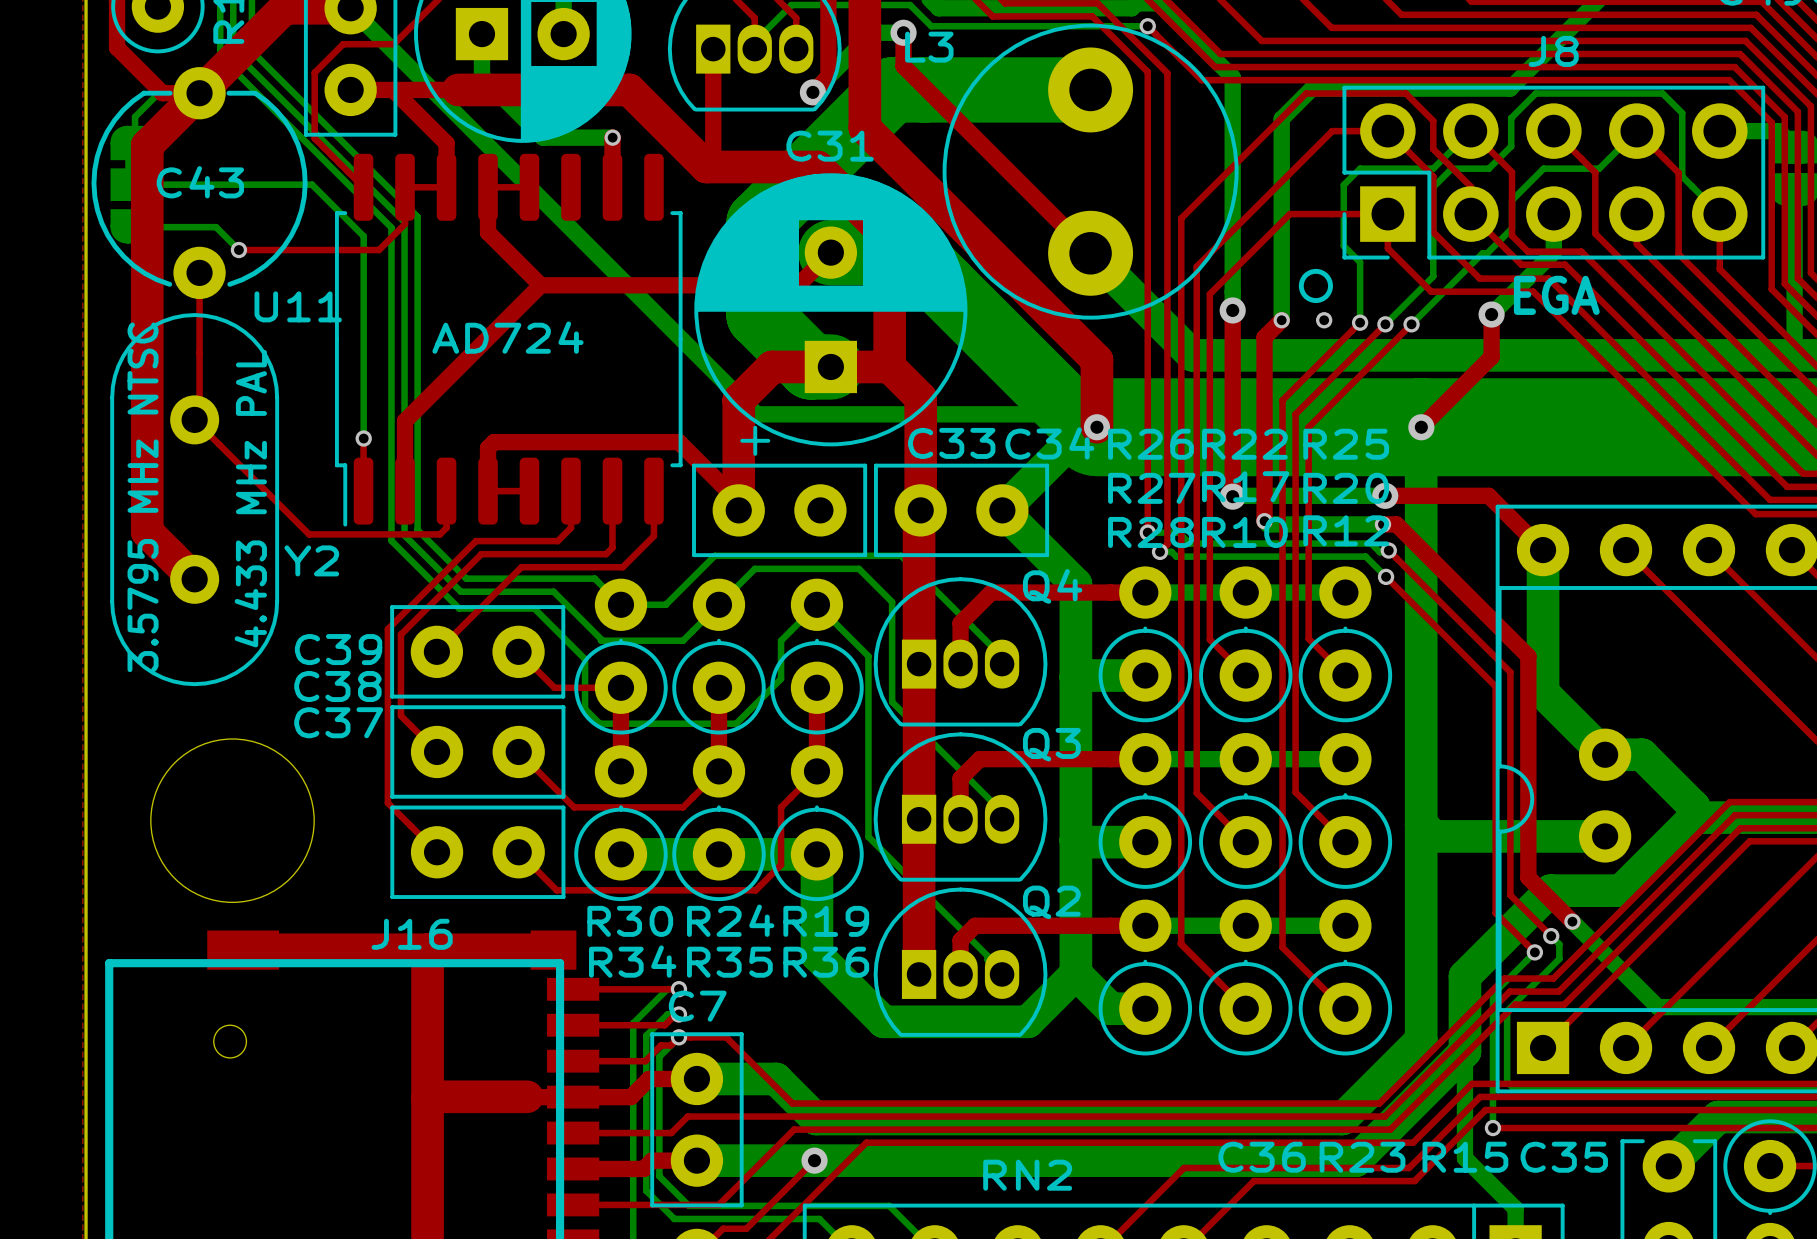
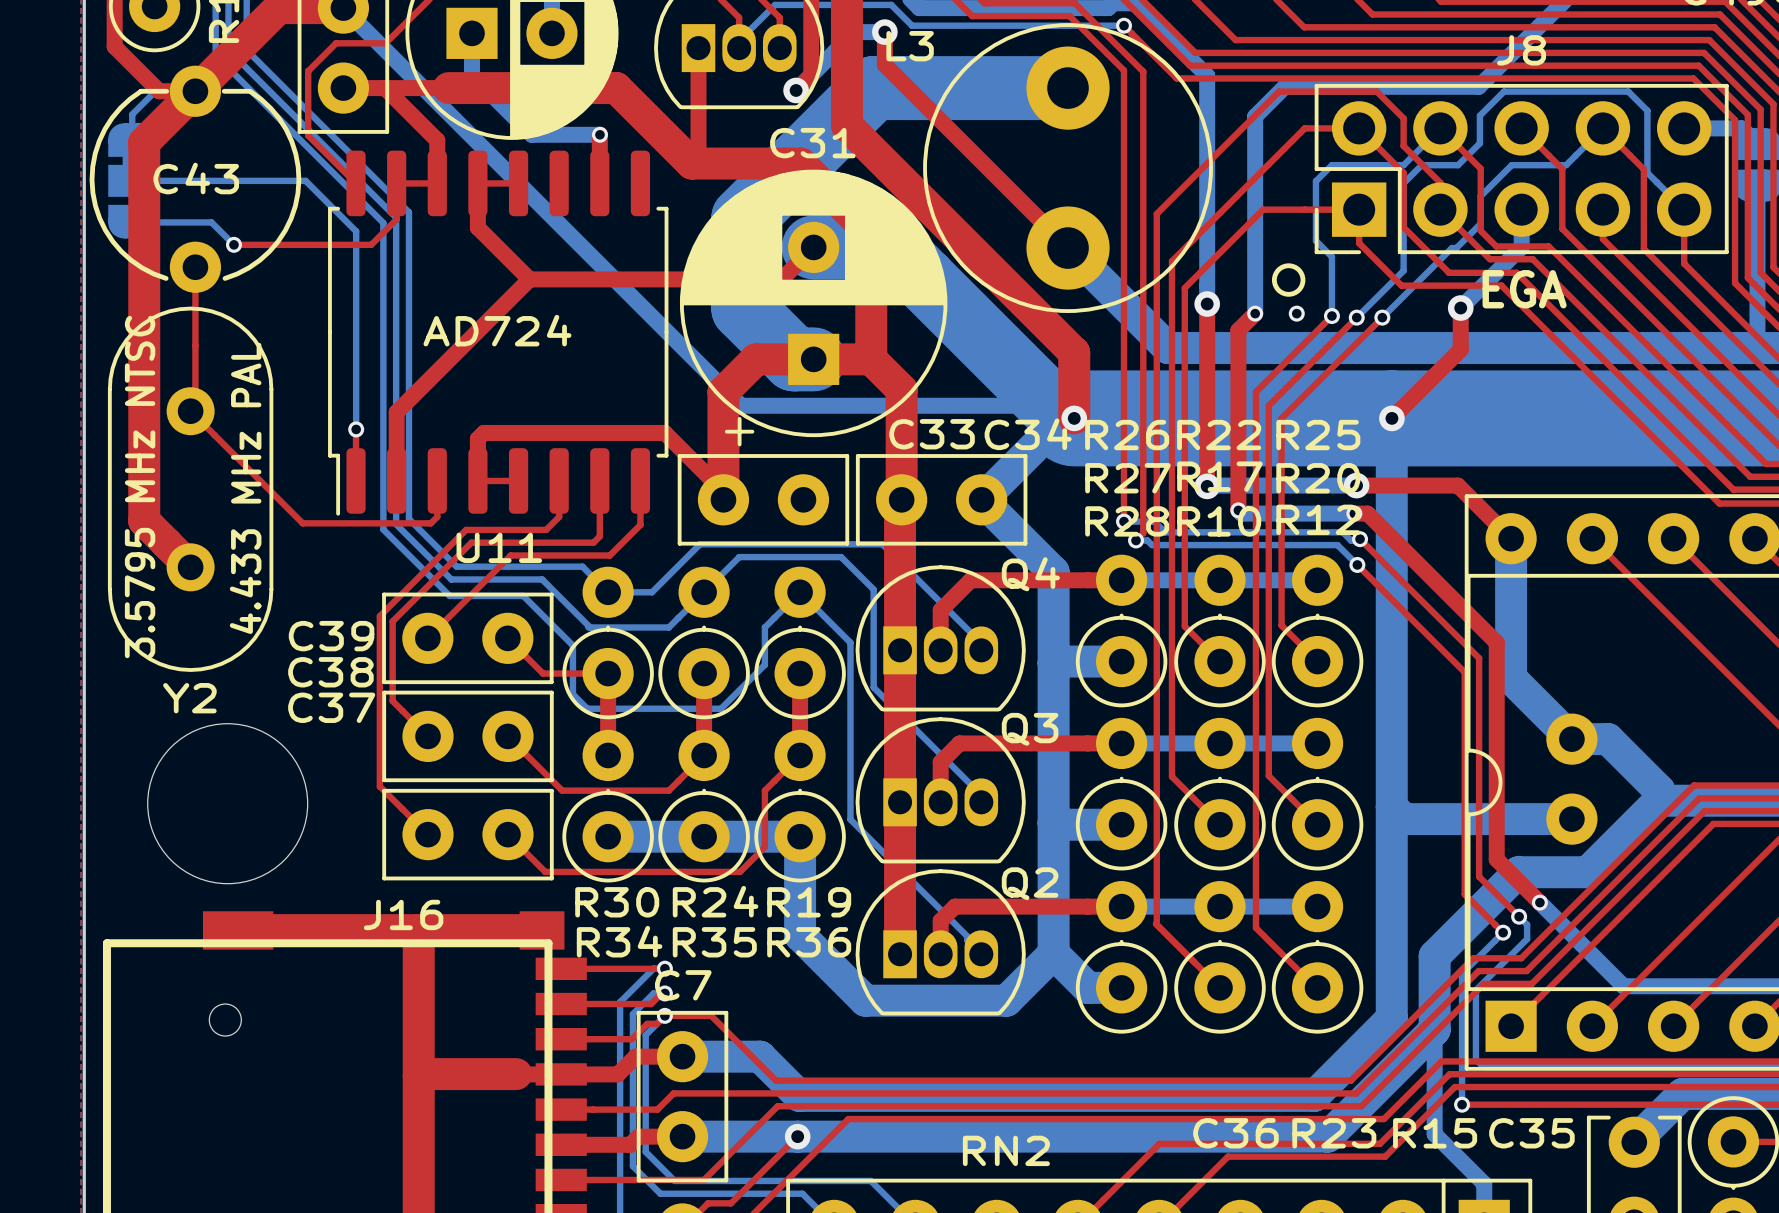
U11 name position: U11 (298, 306) -> U11 (499, 547)
Y2 name position: Y2 (311, 560) -> Y2 (189, 698)

